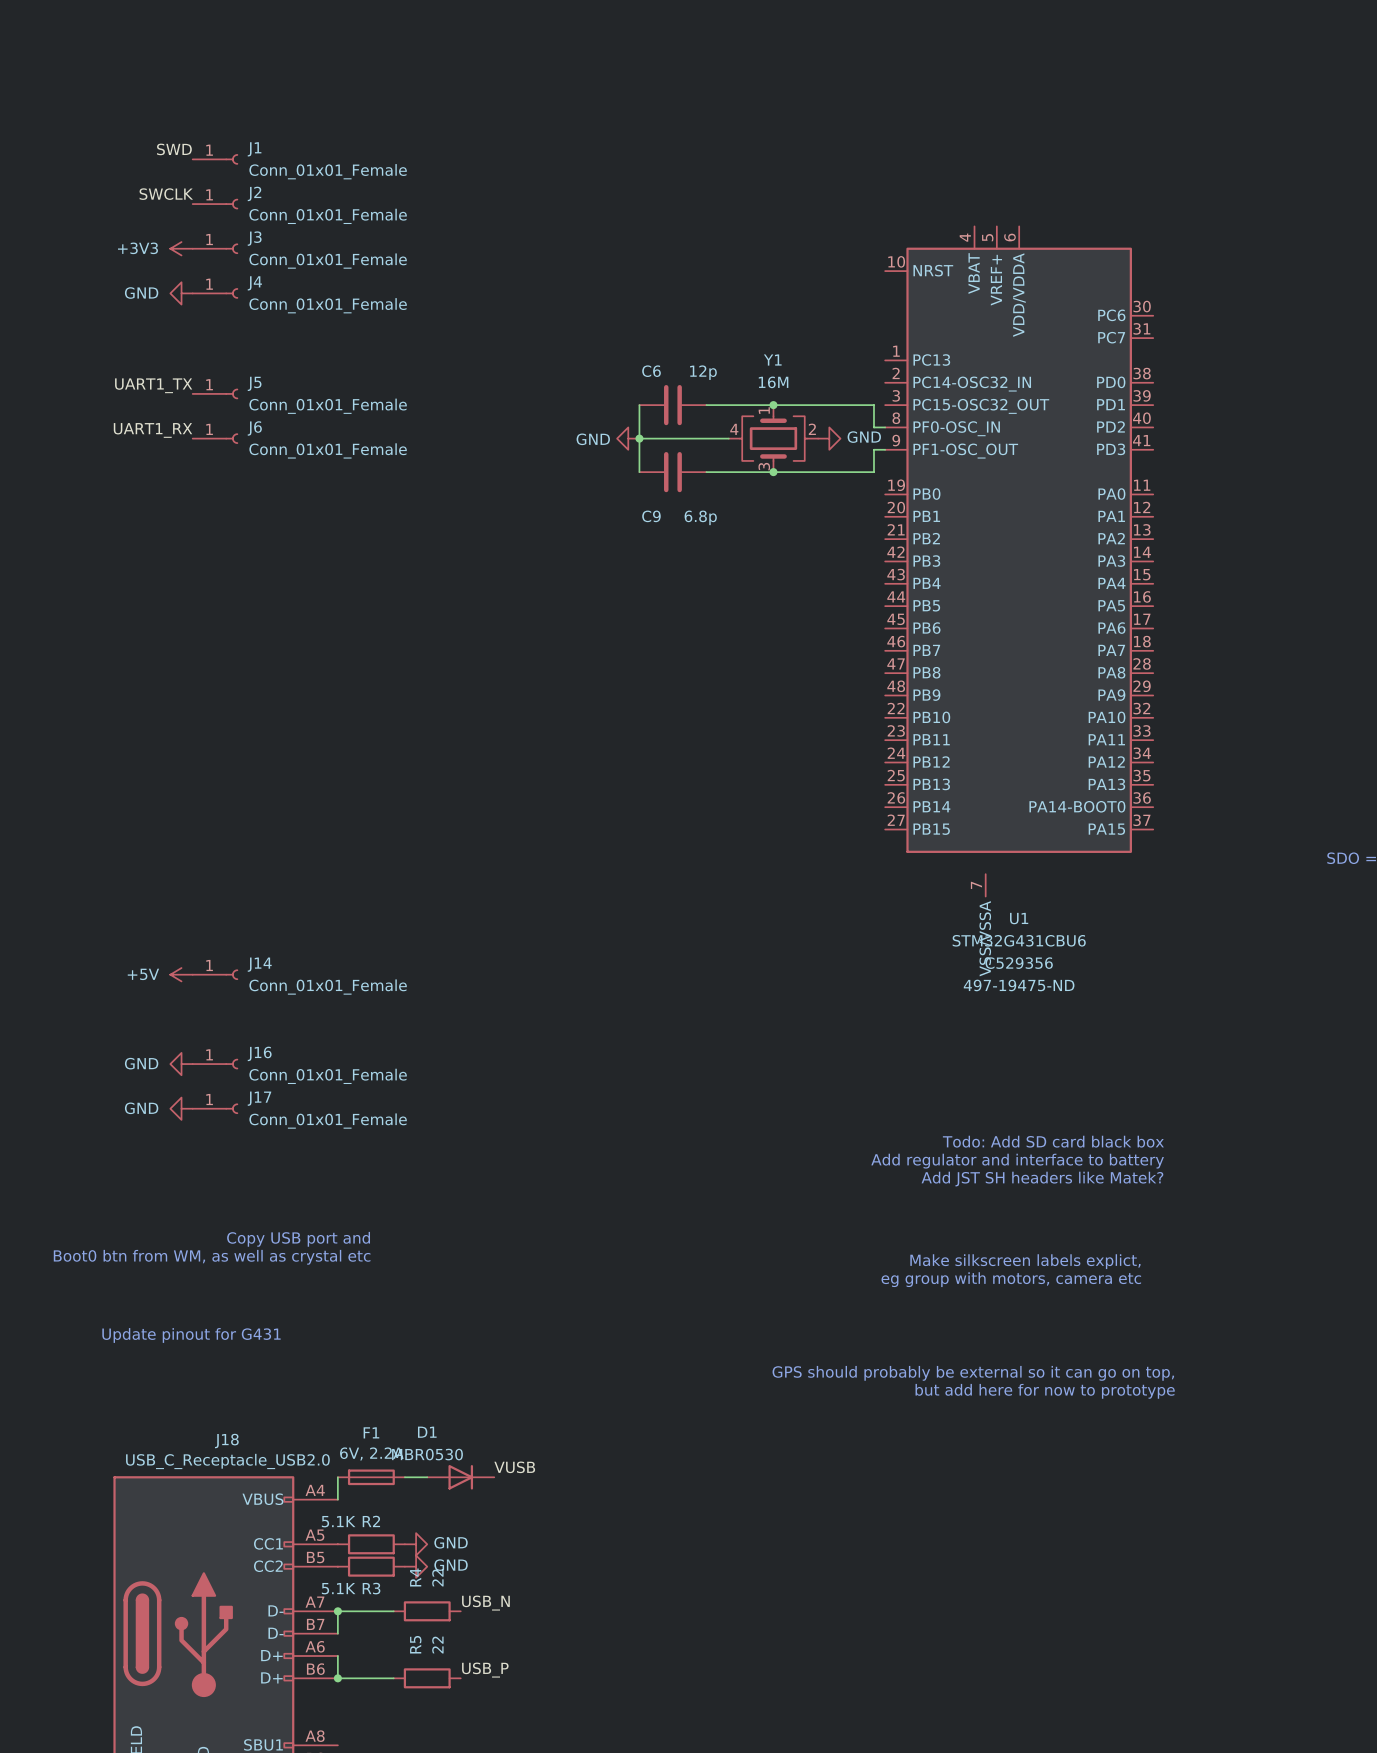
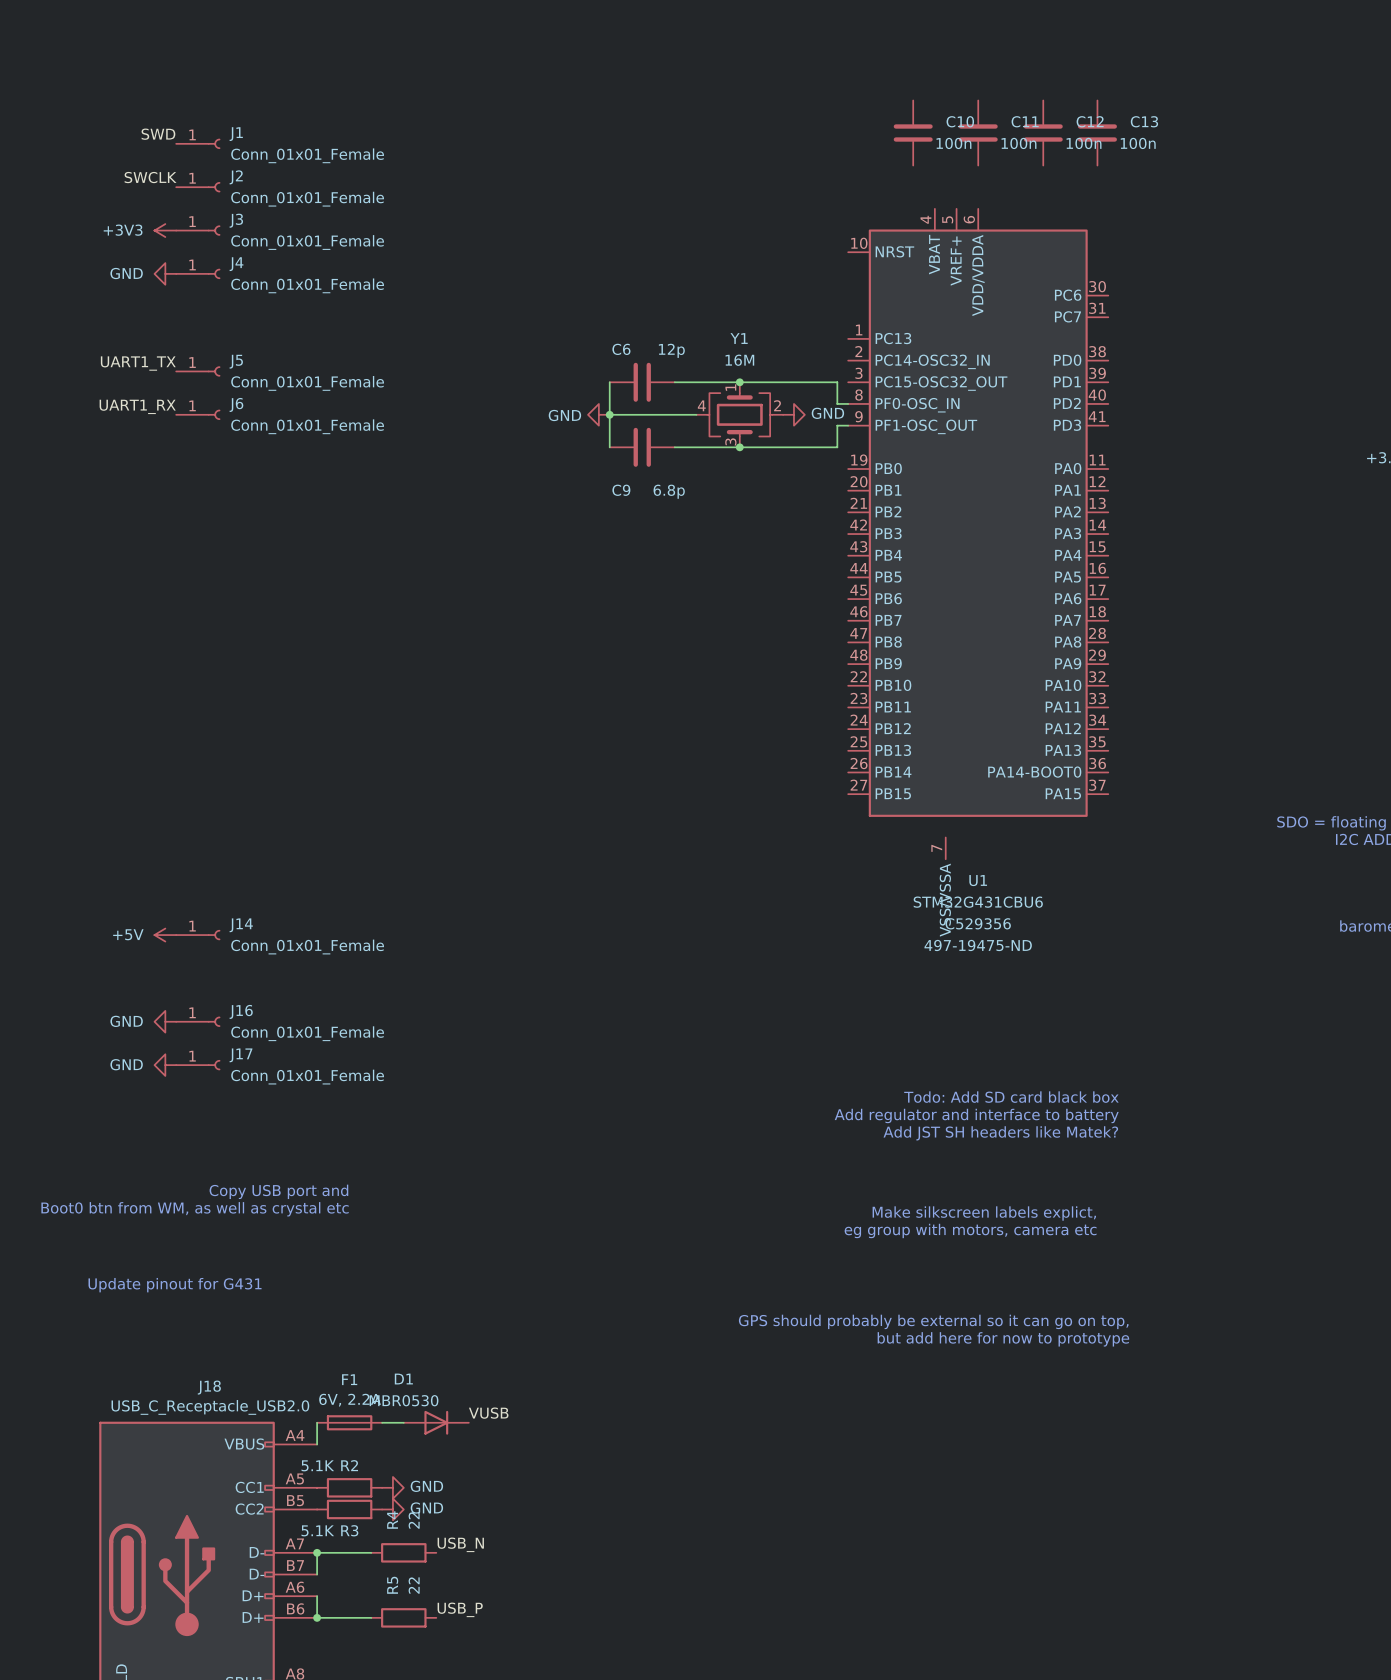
C10: none -> 100n (913, 133)
C11: none -> 100n (978, 133)
C12: none -> 100n (1043, 133)
C13: none -> 100n (1097, 133)

